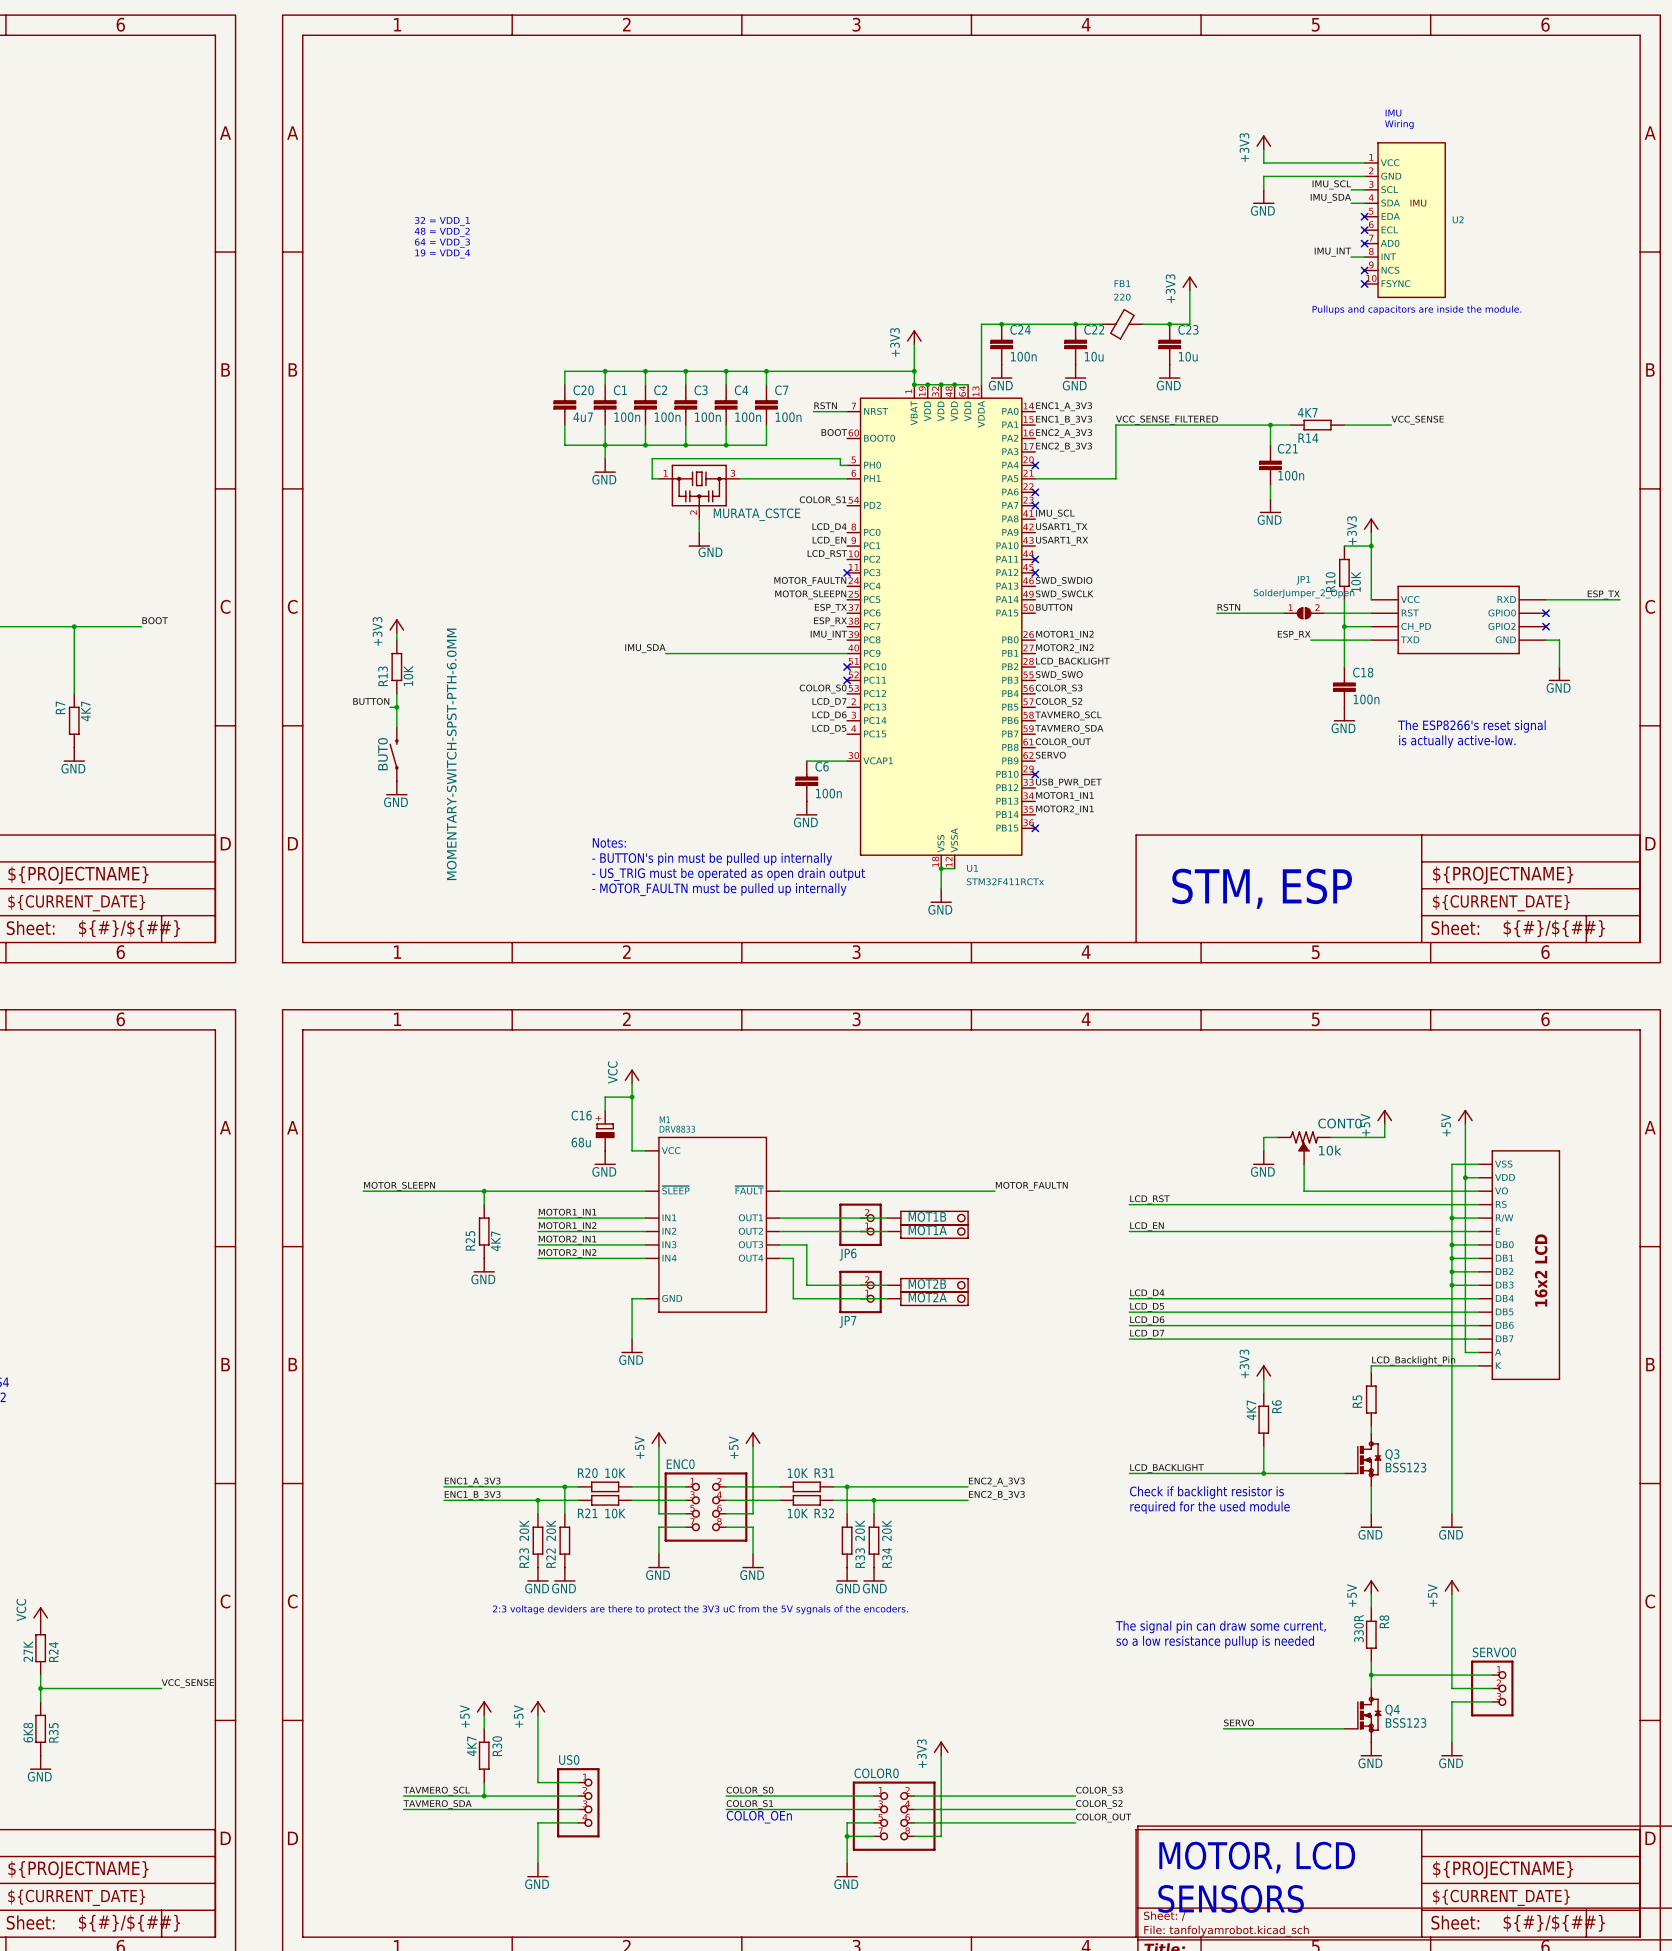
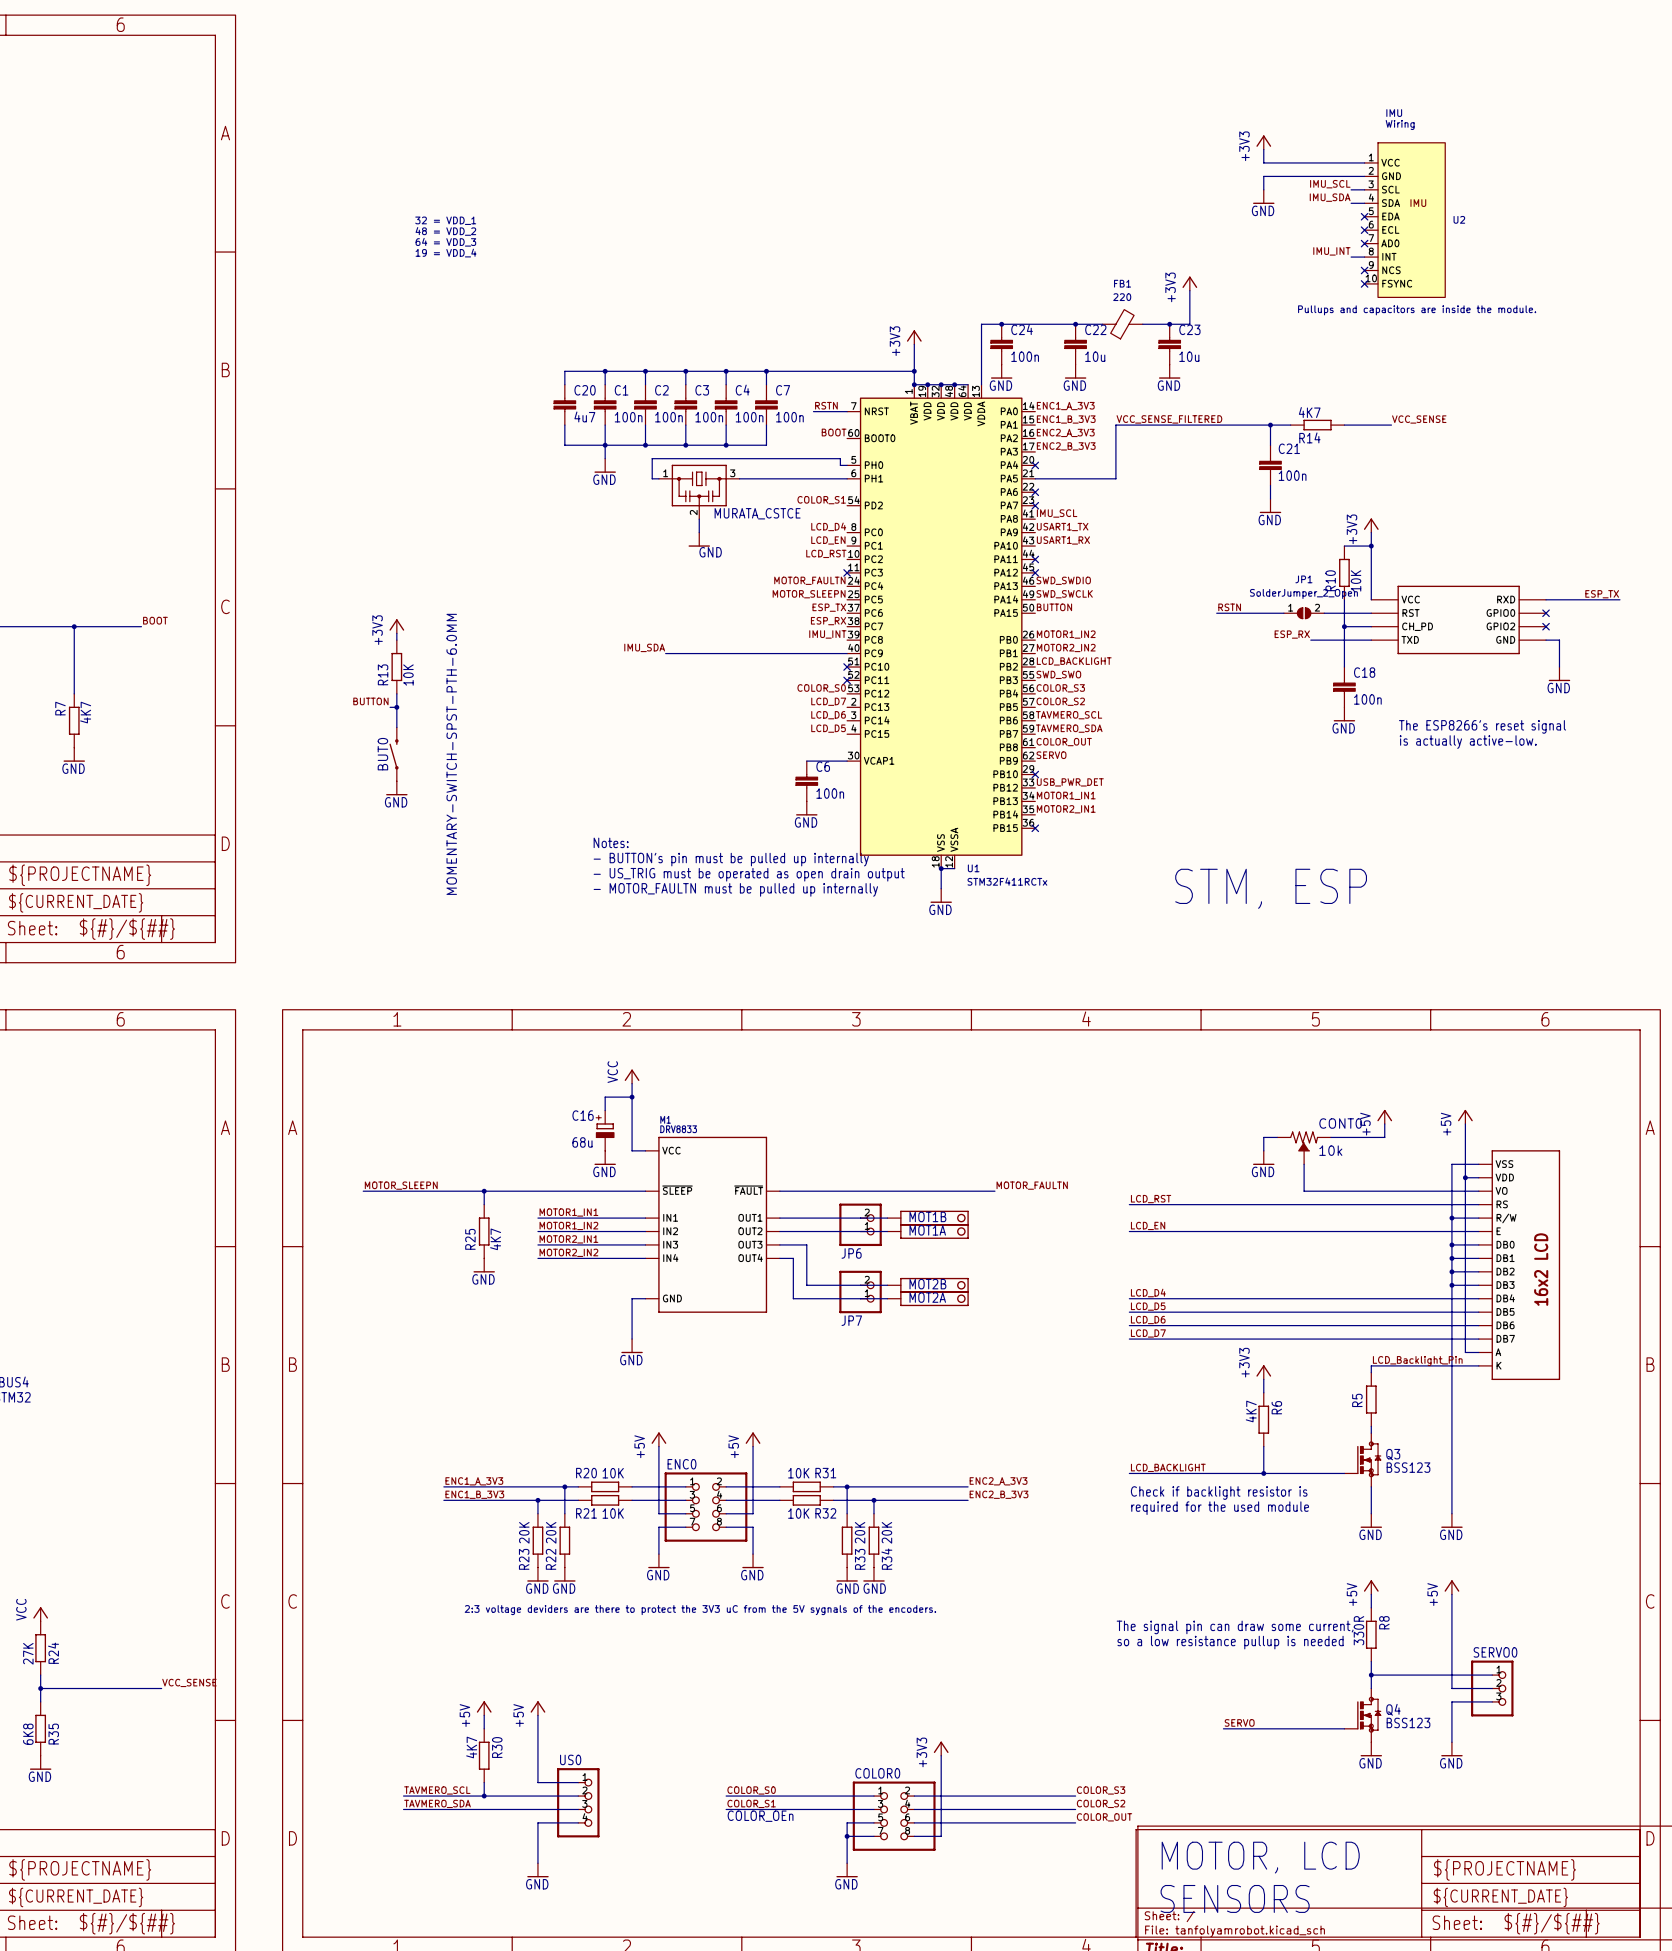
power symbol: (971, 488) -> none

